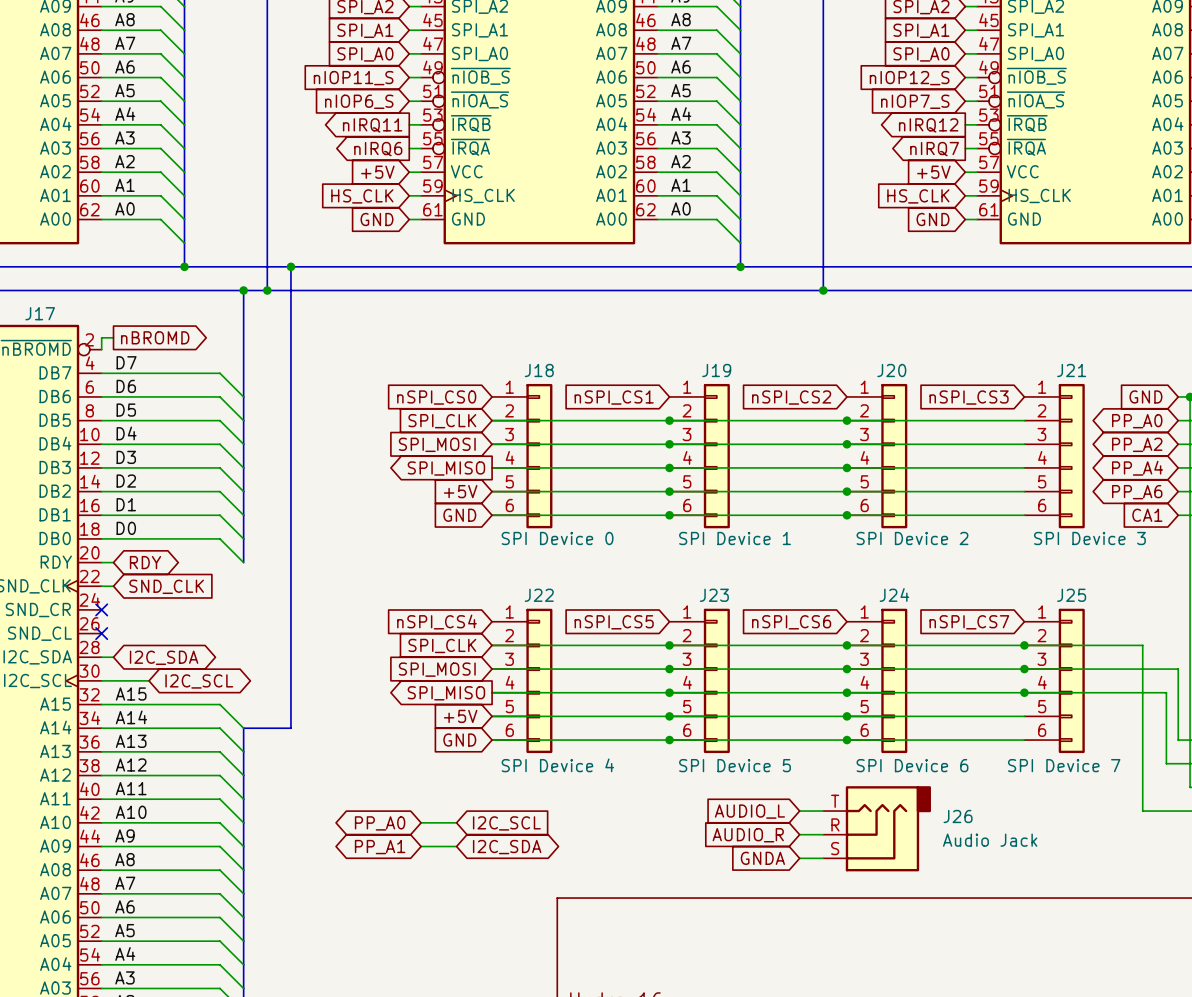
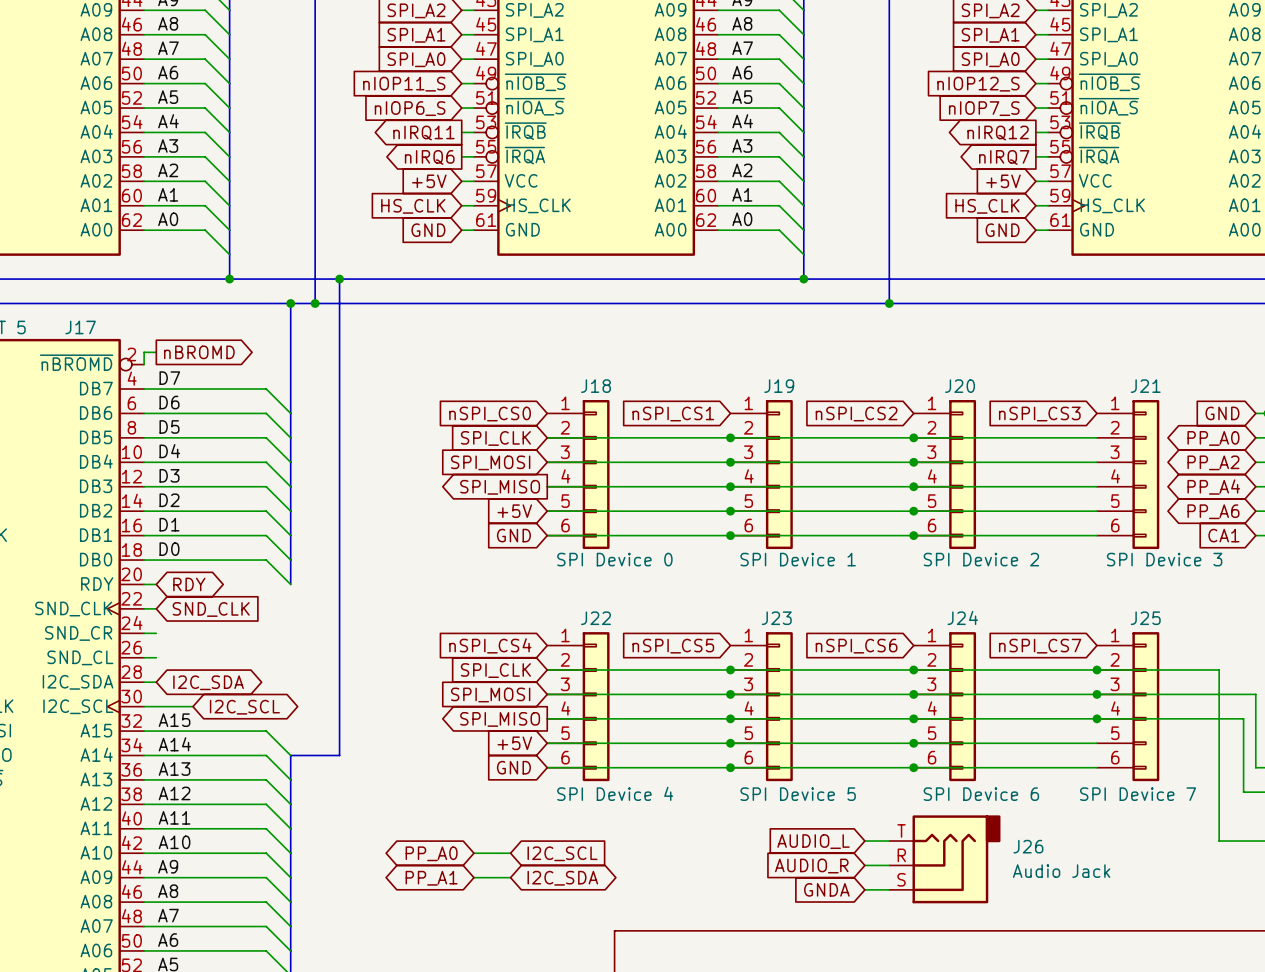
wire: none -> (144, 633) (156, 633)
no-connect mark: (101, 609) -> none
wire: none -> (144, 657) (156, 657)
no-connect mark: (101, 633) -> none

